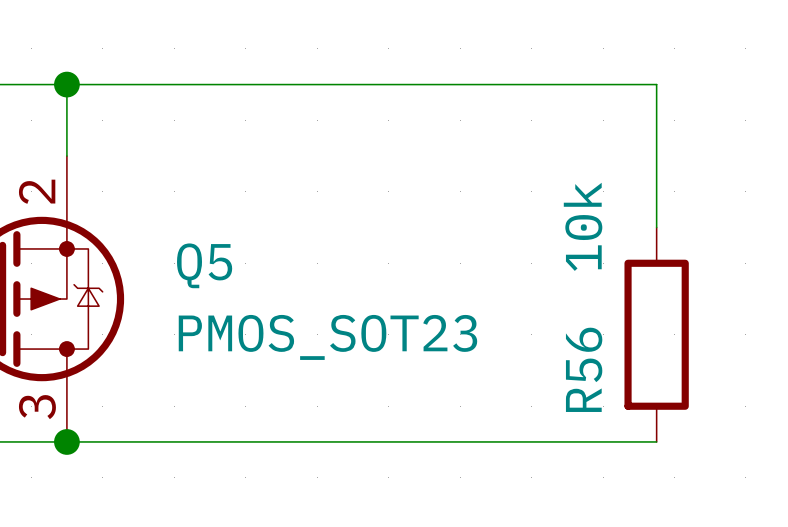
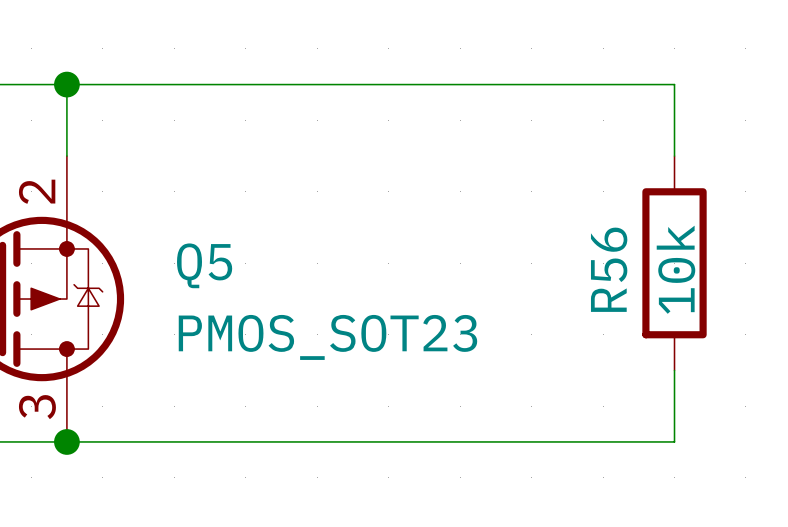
wire: (656, 84) (656, 227) -> (656, 84) (674, 84) (674, 156)
R56 value position: 10k (583, 226) -> 10k (675, 269)
R56 position: (656, 334) -> (674, 263)
R56 name position: R56 (584, 369) -> R56 (609, 269)
wire: none -> (674, 370) (674, 441) (656, 441)

